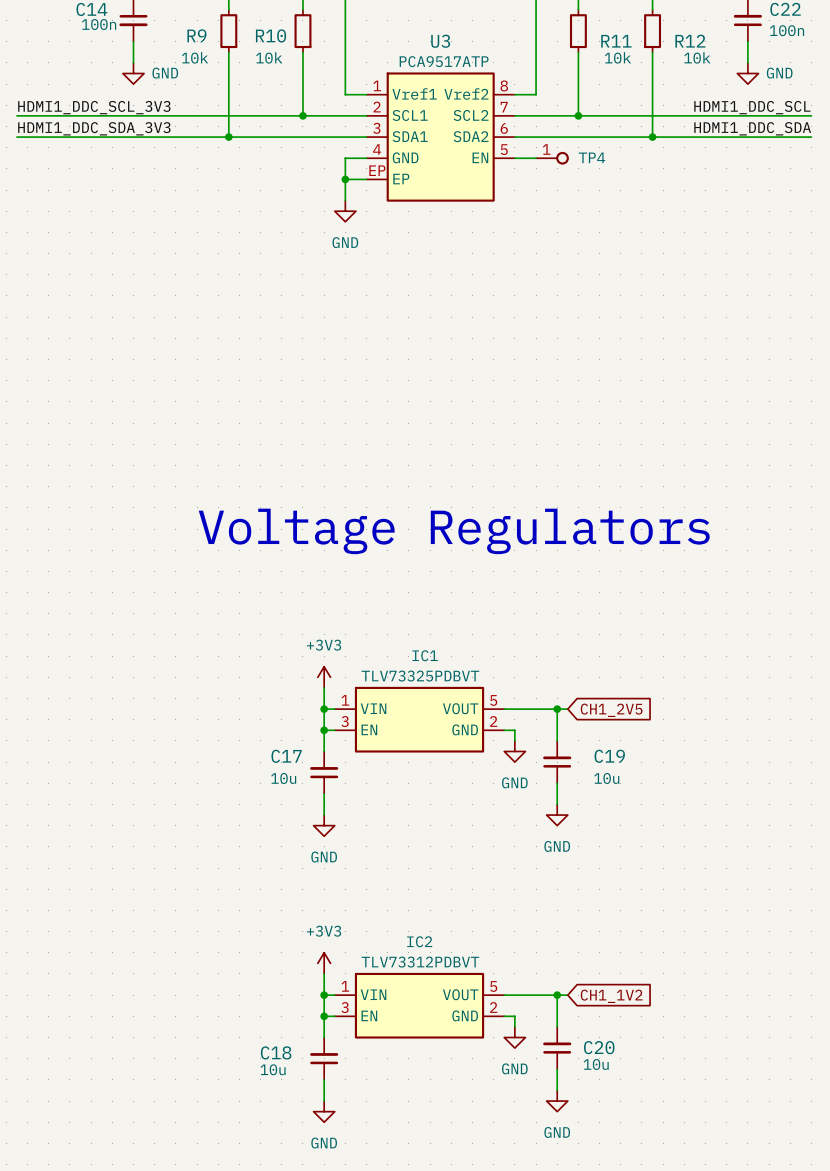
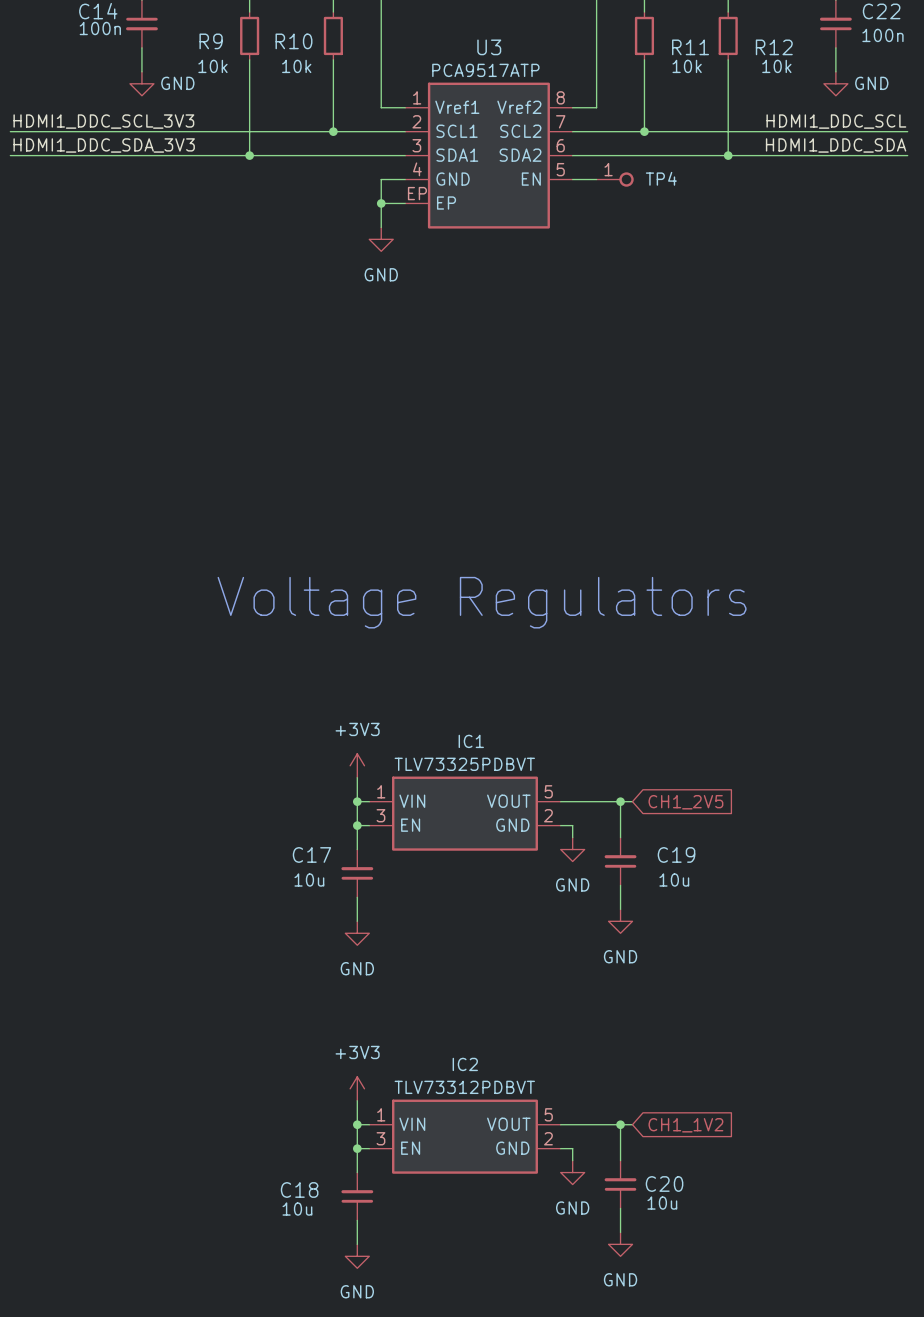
U3 text: none -> PCA9517ATP (485, 70)
U3 value: PCA9517ATP (444, 61) -> none
IC1 text: none -> TLV73325PDBVT (464, 764)
IC1 value: TLV73325PDBVT (420, 676) -> none
IC2 text: none -> TLV73312PDBVT (464, 1087)
IC2 value: TLV73312PDBVT (420, 962) -> none

